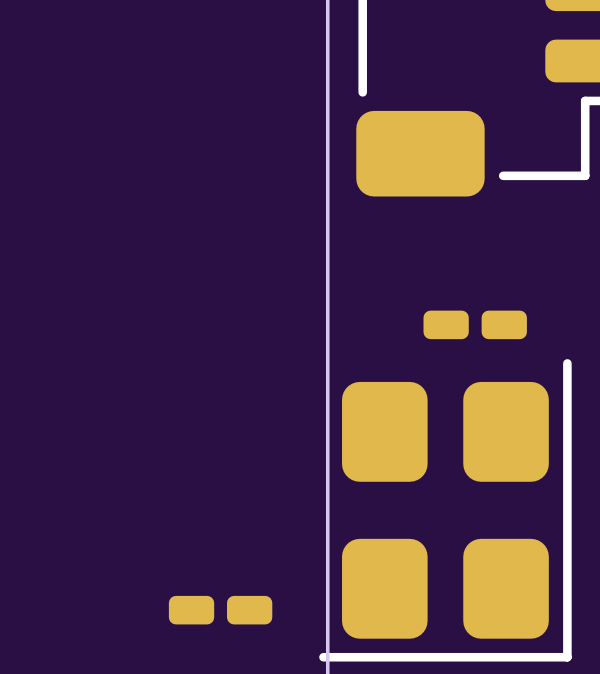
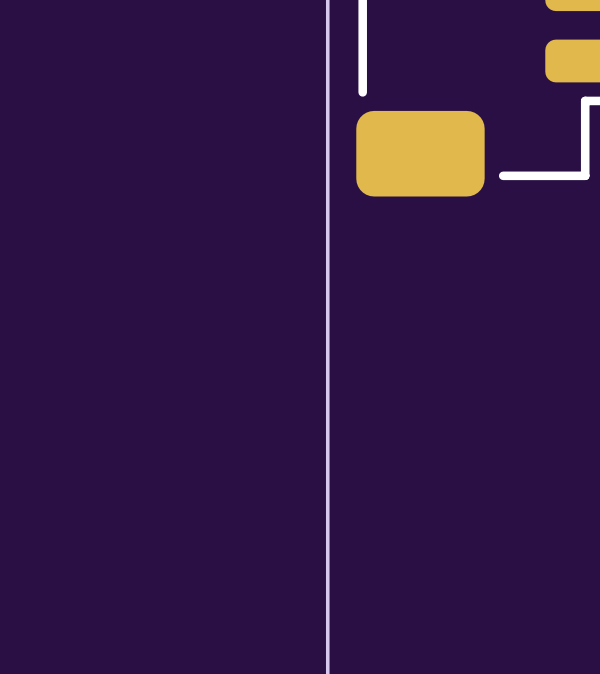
part: (475, 324) -> none
part: (445, 510) -> none
part: (220, 610) -> none

